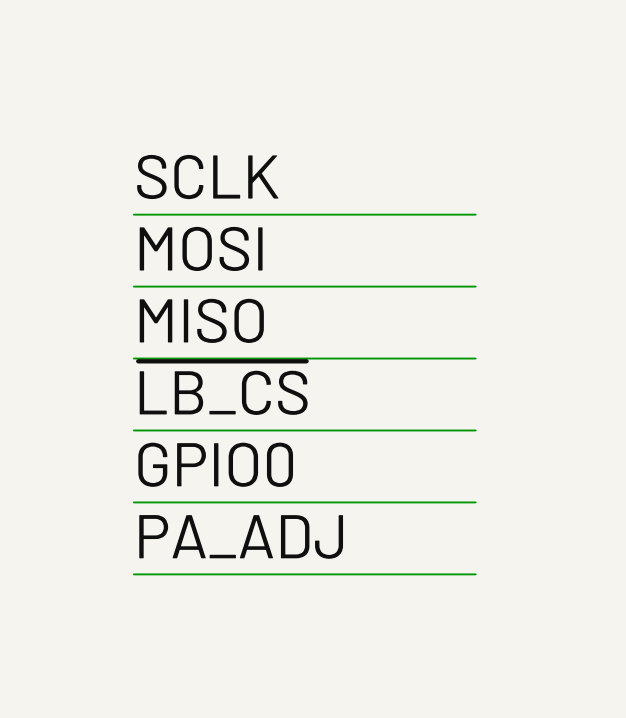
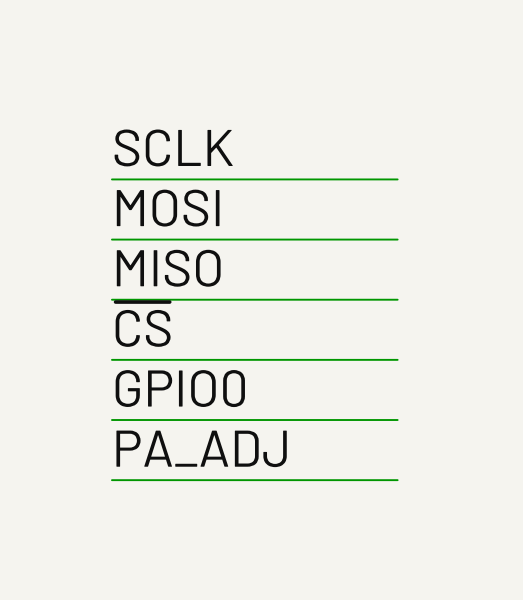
label: ~{LB_CS} (222, 388) -> ~{CS} (143, 324)

